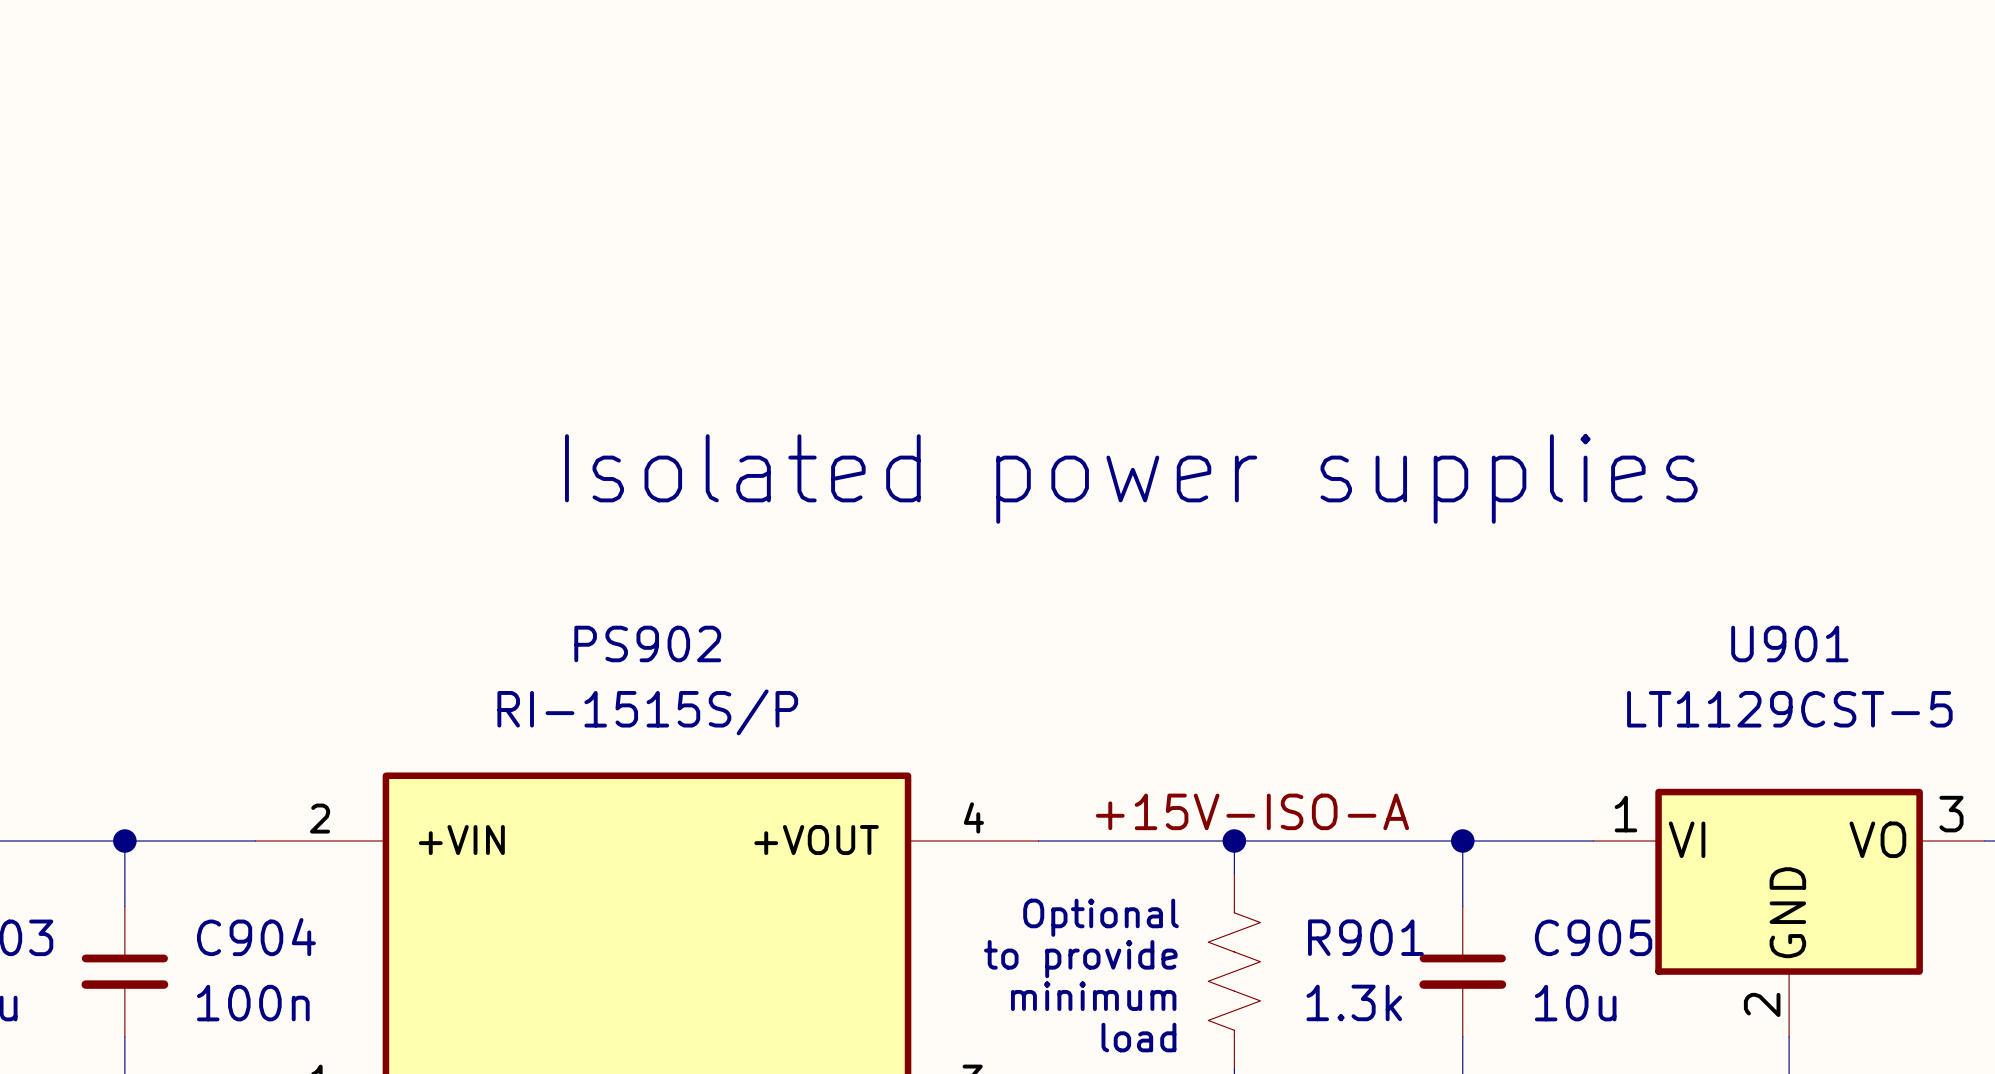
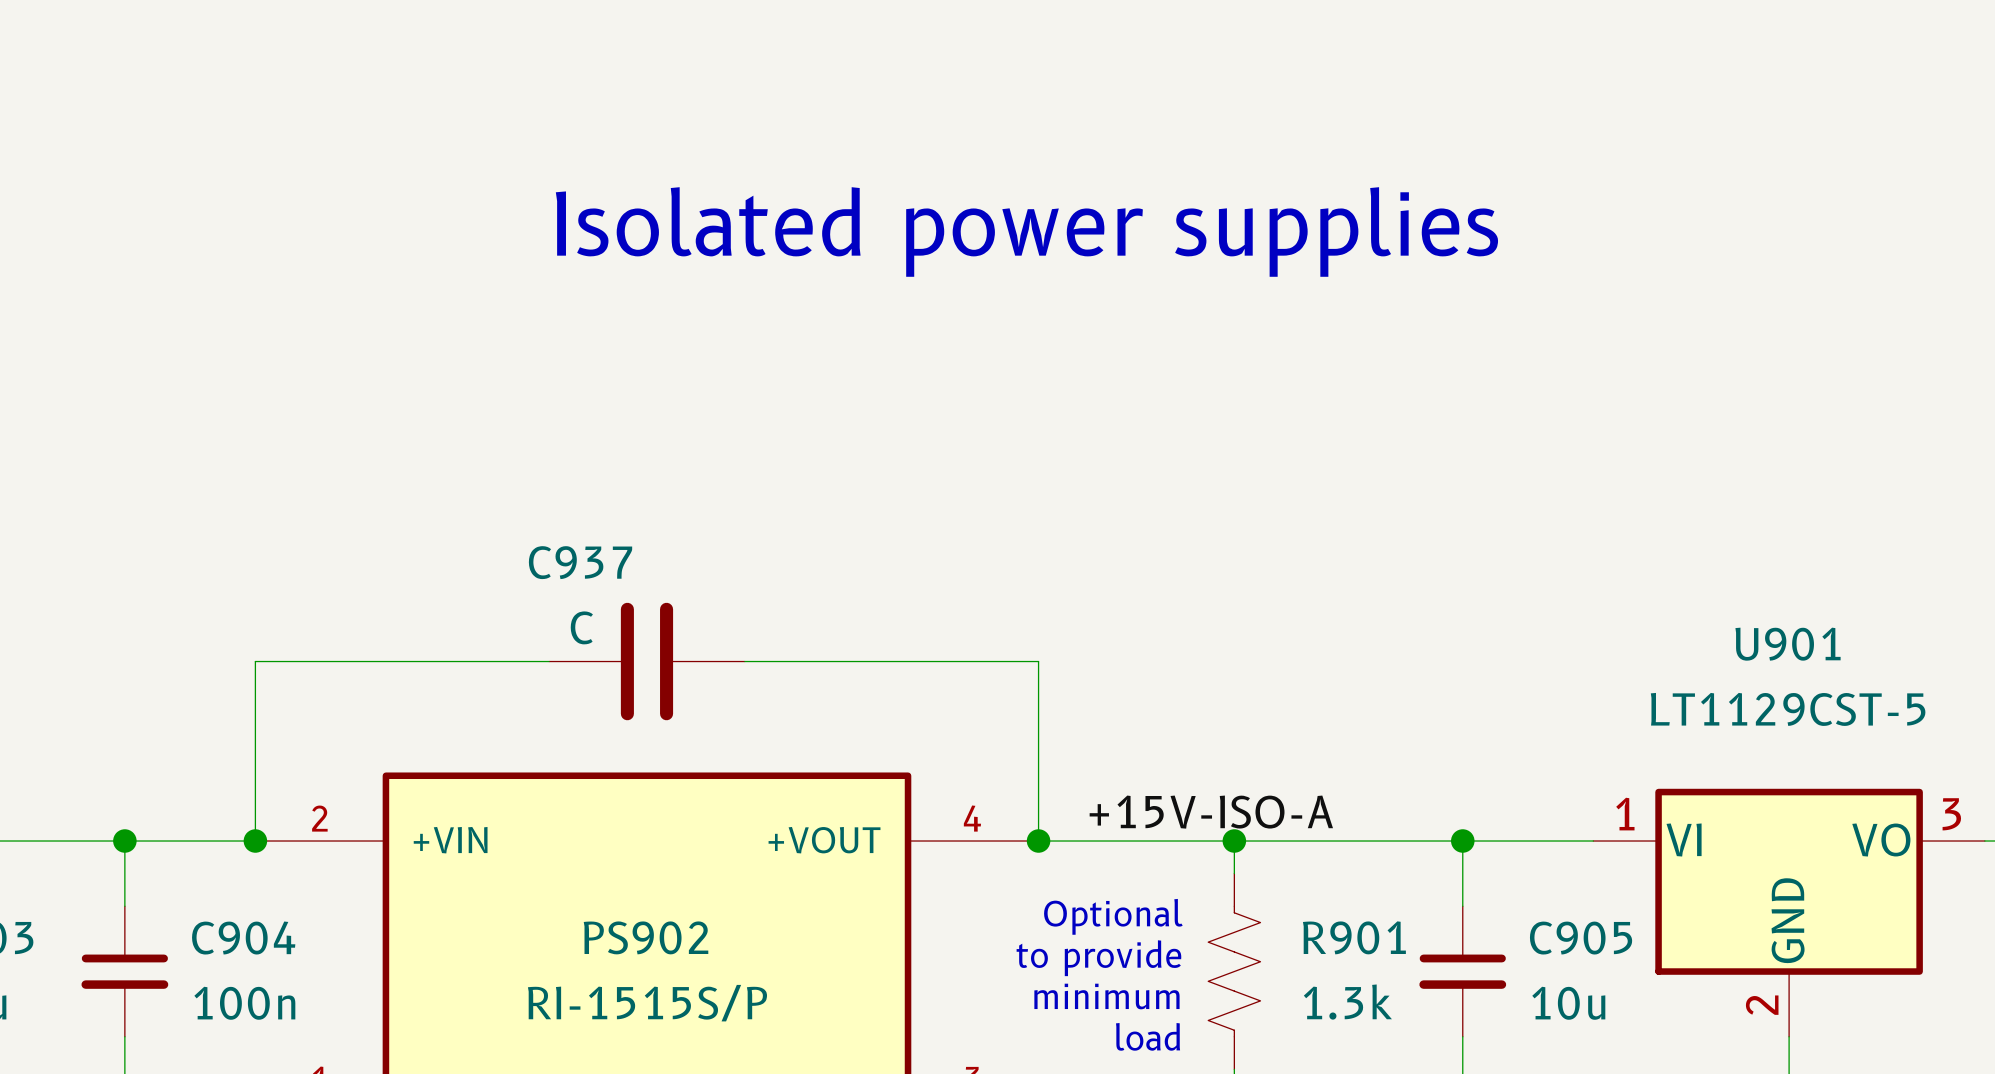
text position: Isolated power supplies (1131, 478) -> Isolated power supplies (1026, 231)
PS902 name position: PS902 (647, 643) -> PS902 (646, 937)
wire: none -> (549, 661) (255, 661) (255, 841)
C937: none -> C (646, 661)
wire: none -> (744, 661) (1038, 661) (1038, 841)
PS902 value position: RI-1515S/P (647, 712) -> RI-1515S/P (647, 1003)
junction: none -> (255, 841)
junction: none -> (1038, 841)

